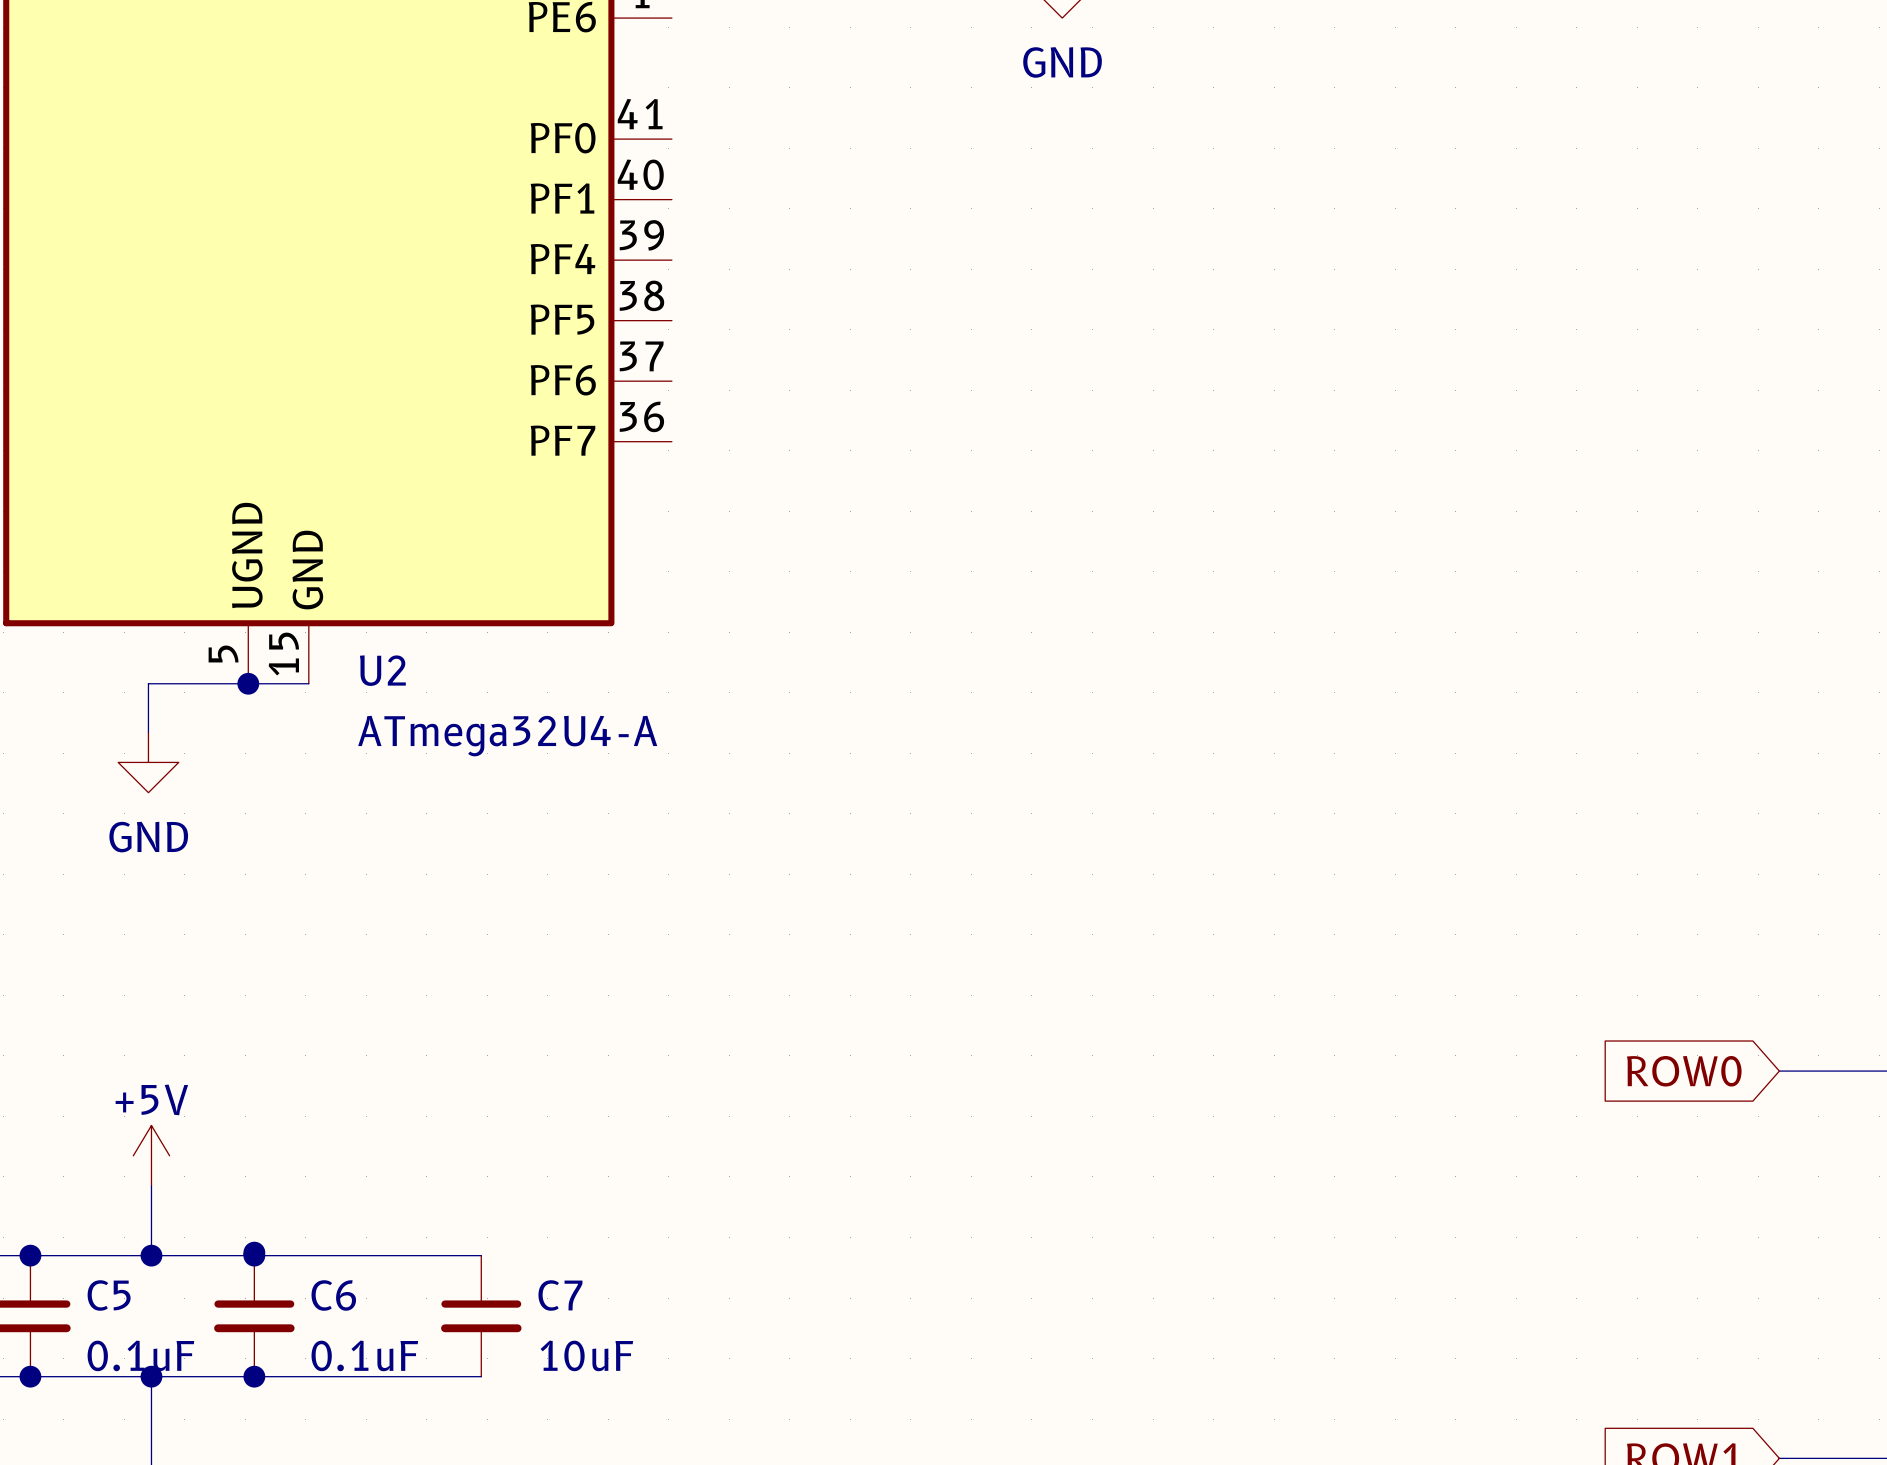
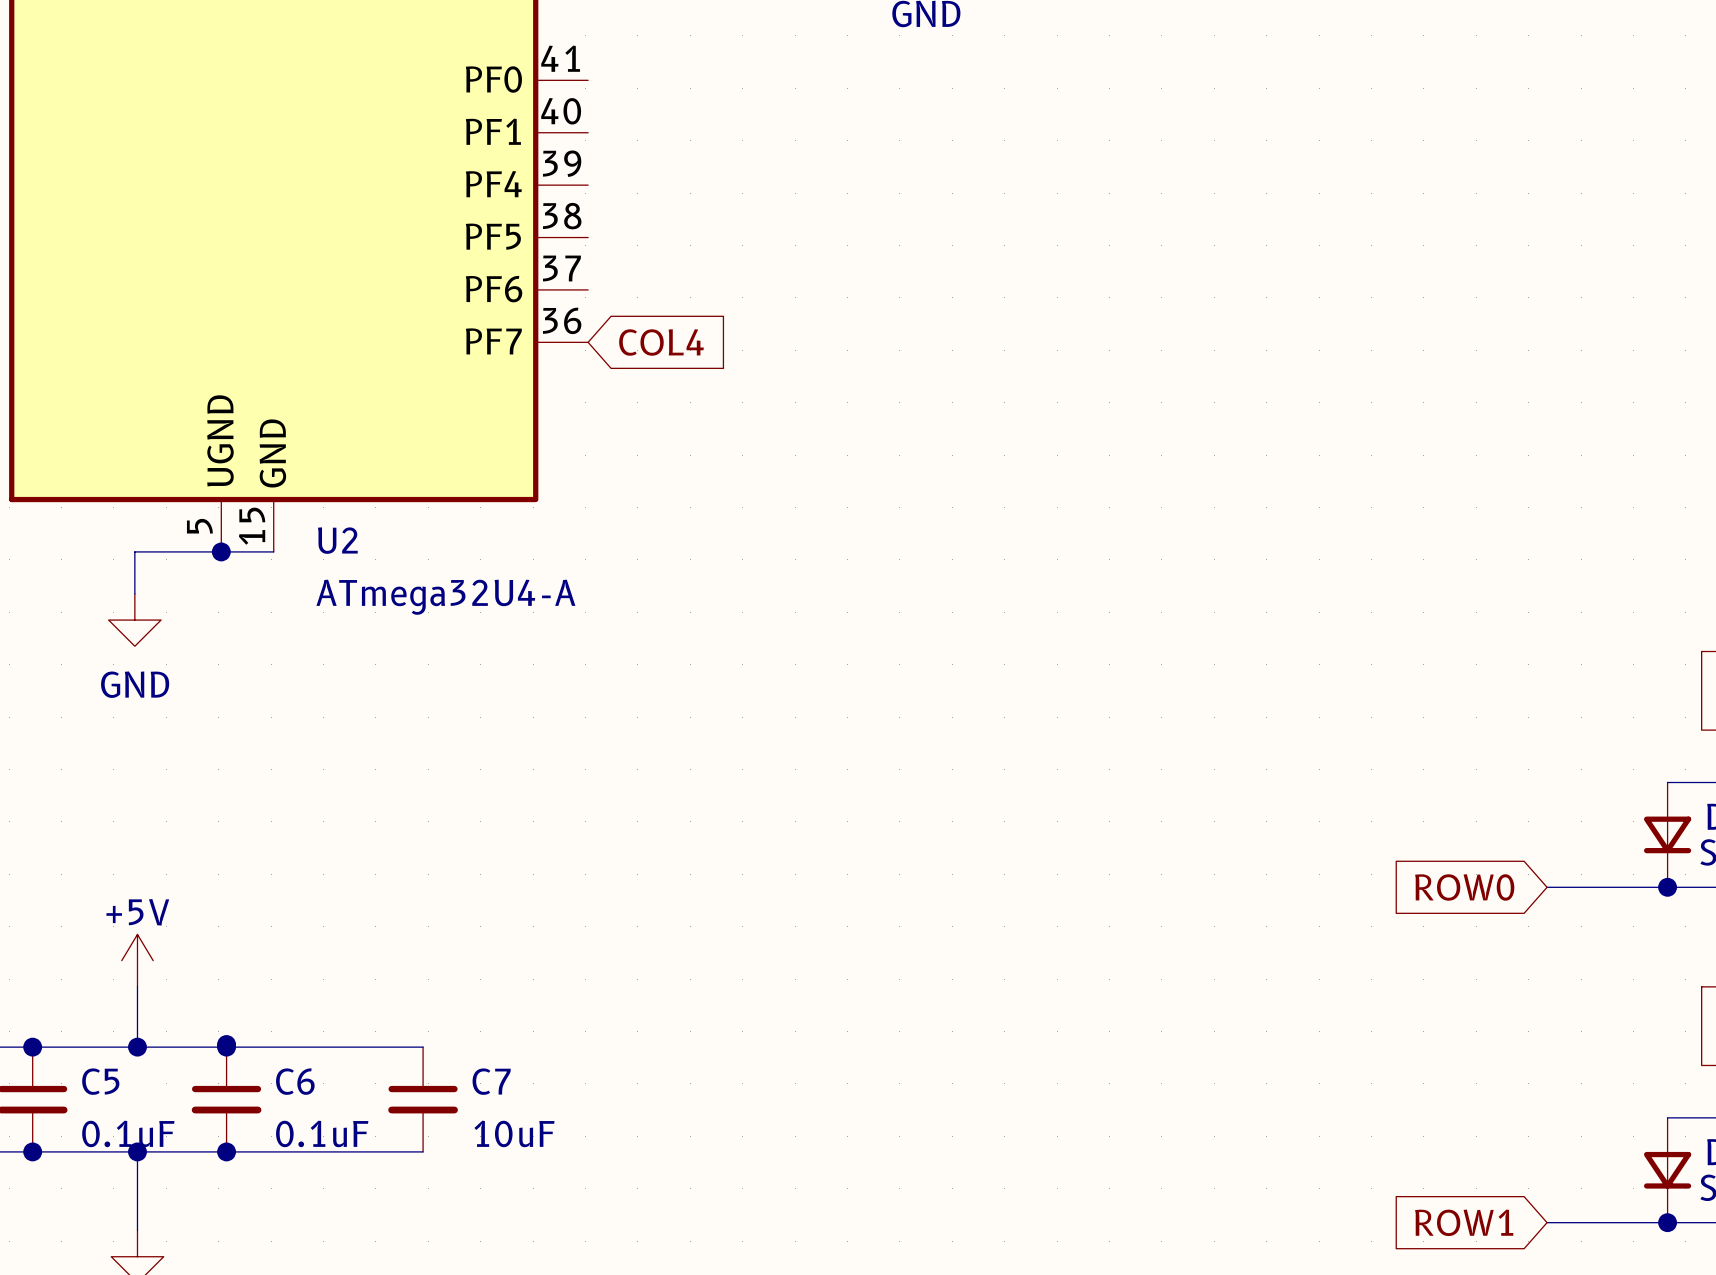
global label: none -> COL4 (661, 342)

